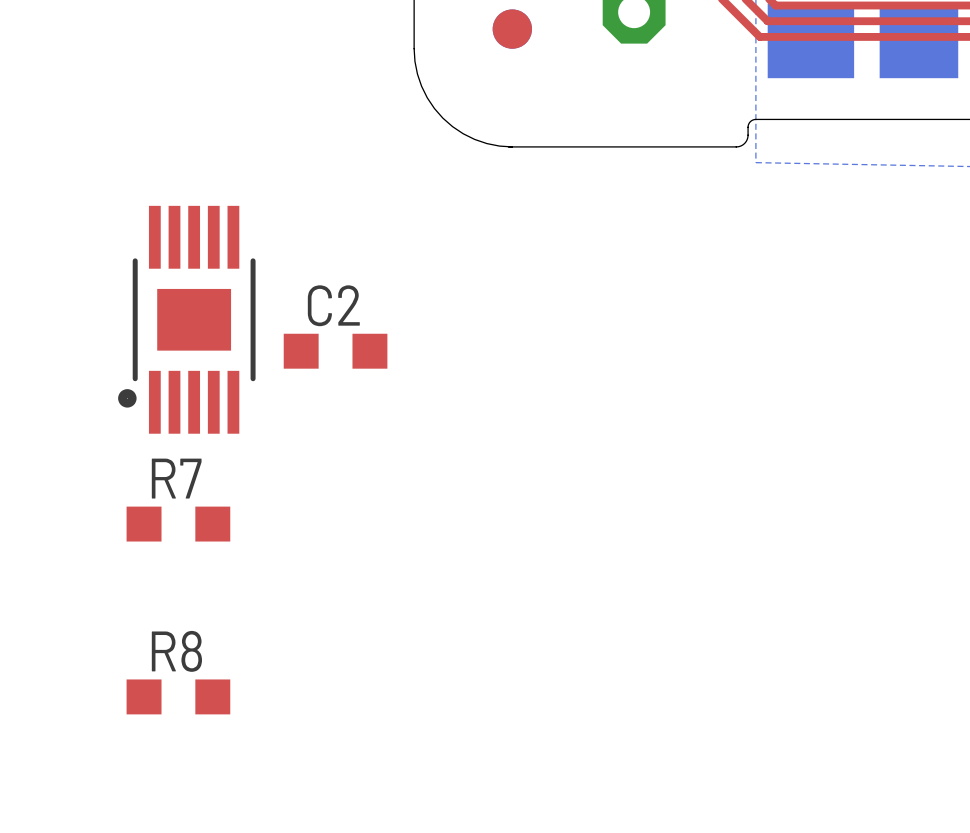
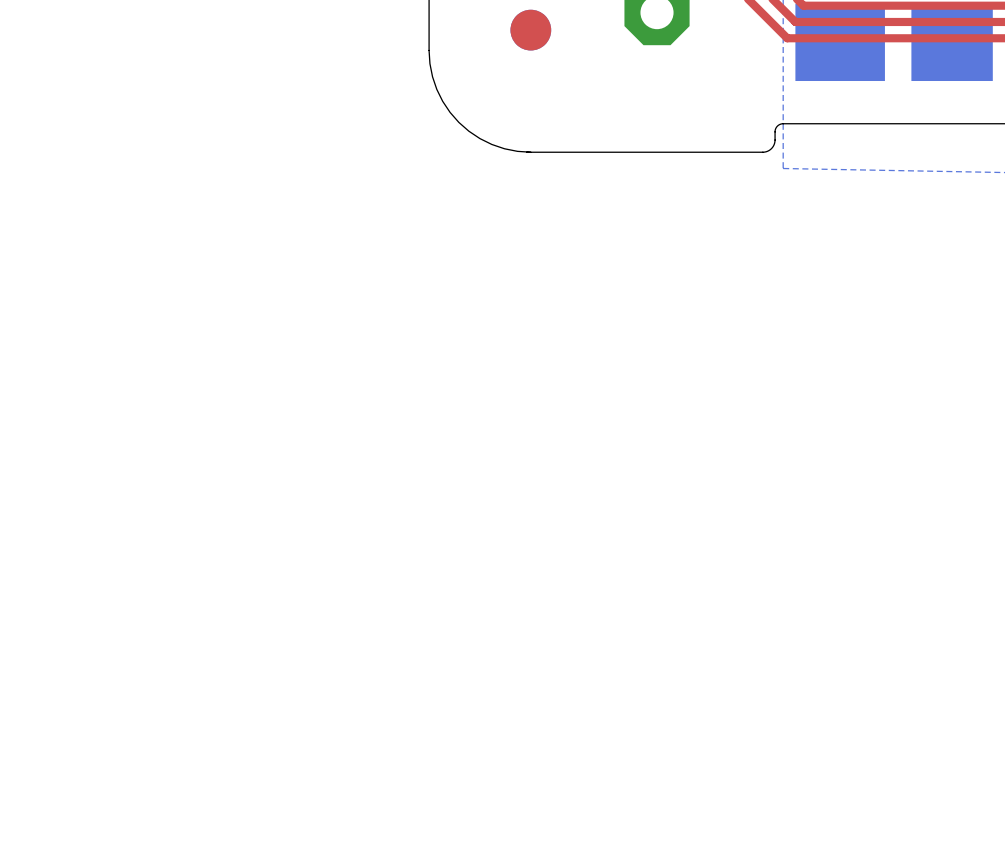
part: (186, 319) -> none
C2: (335, 351) -> none
R7: (178, 524) -> none
R8: (178, 696) -> none

